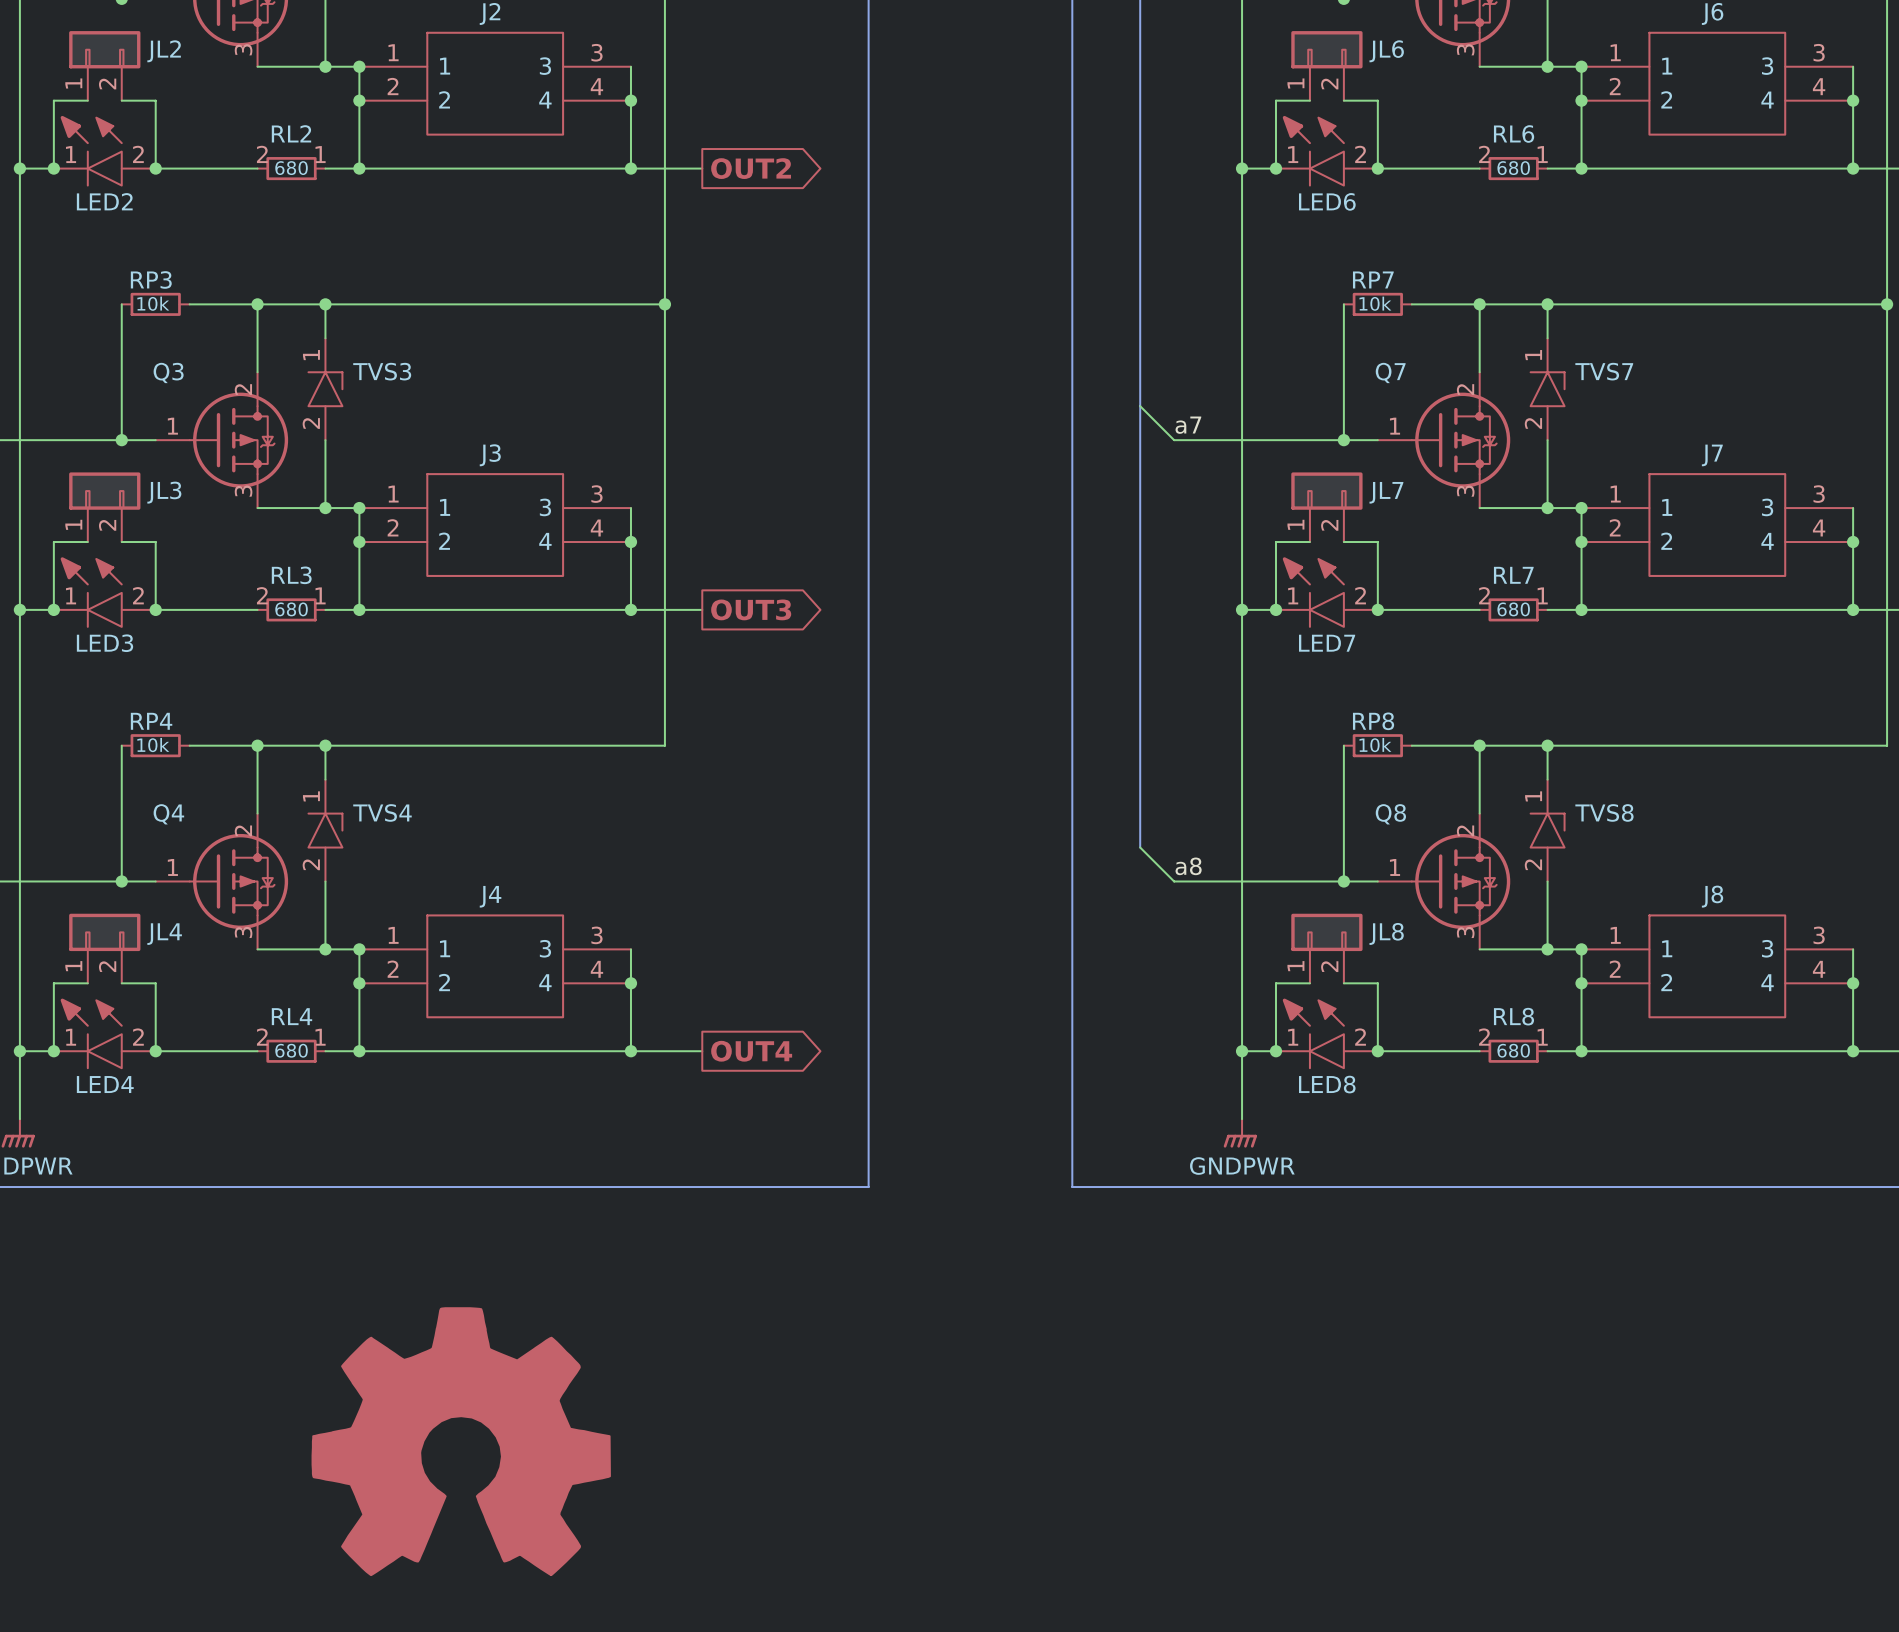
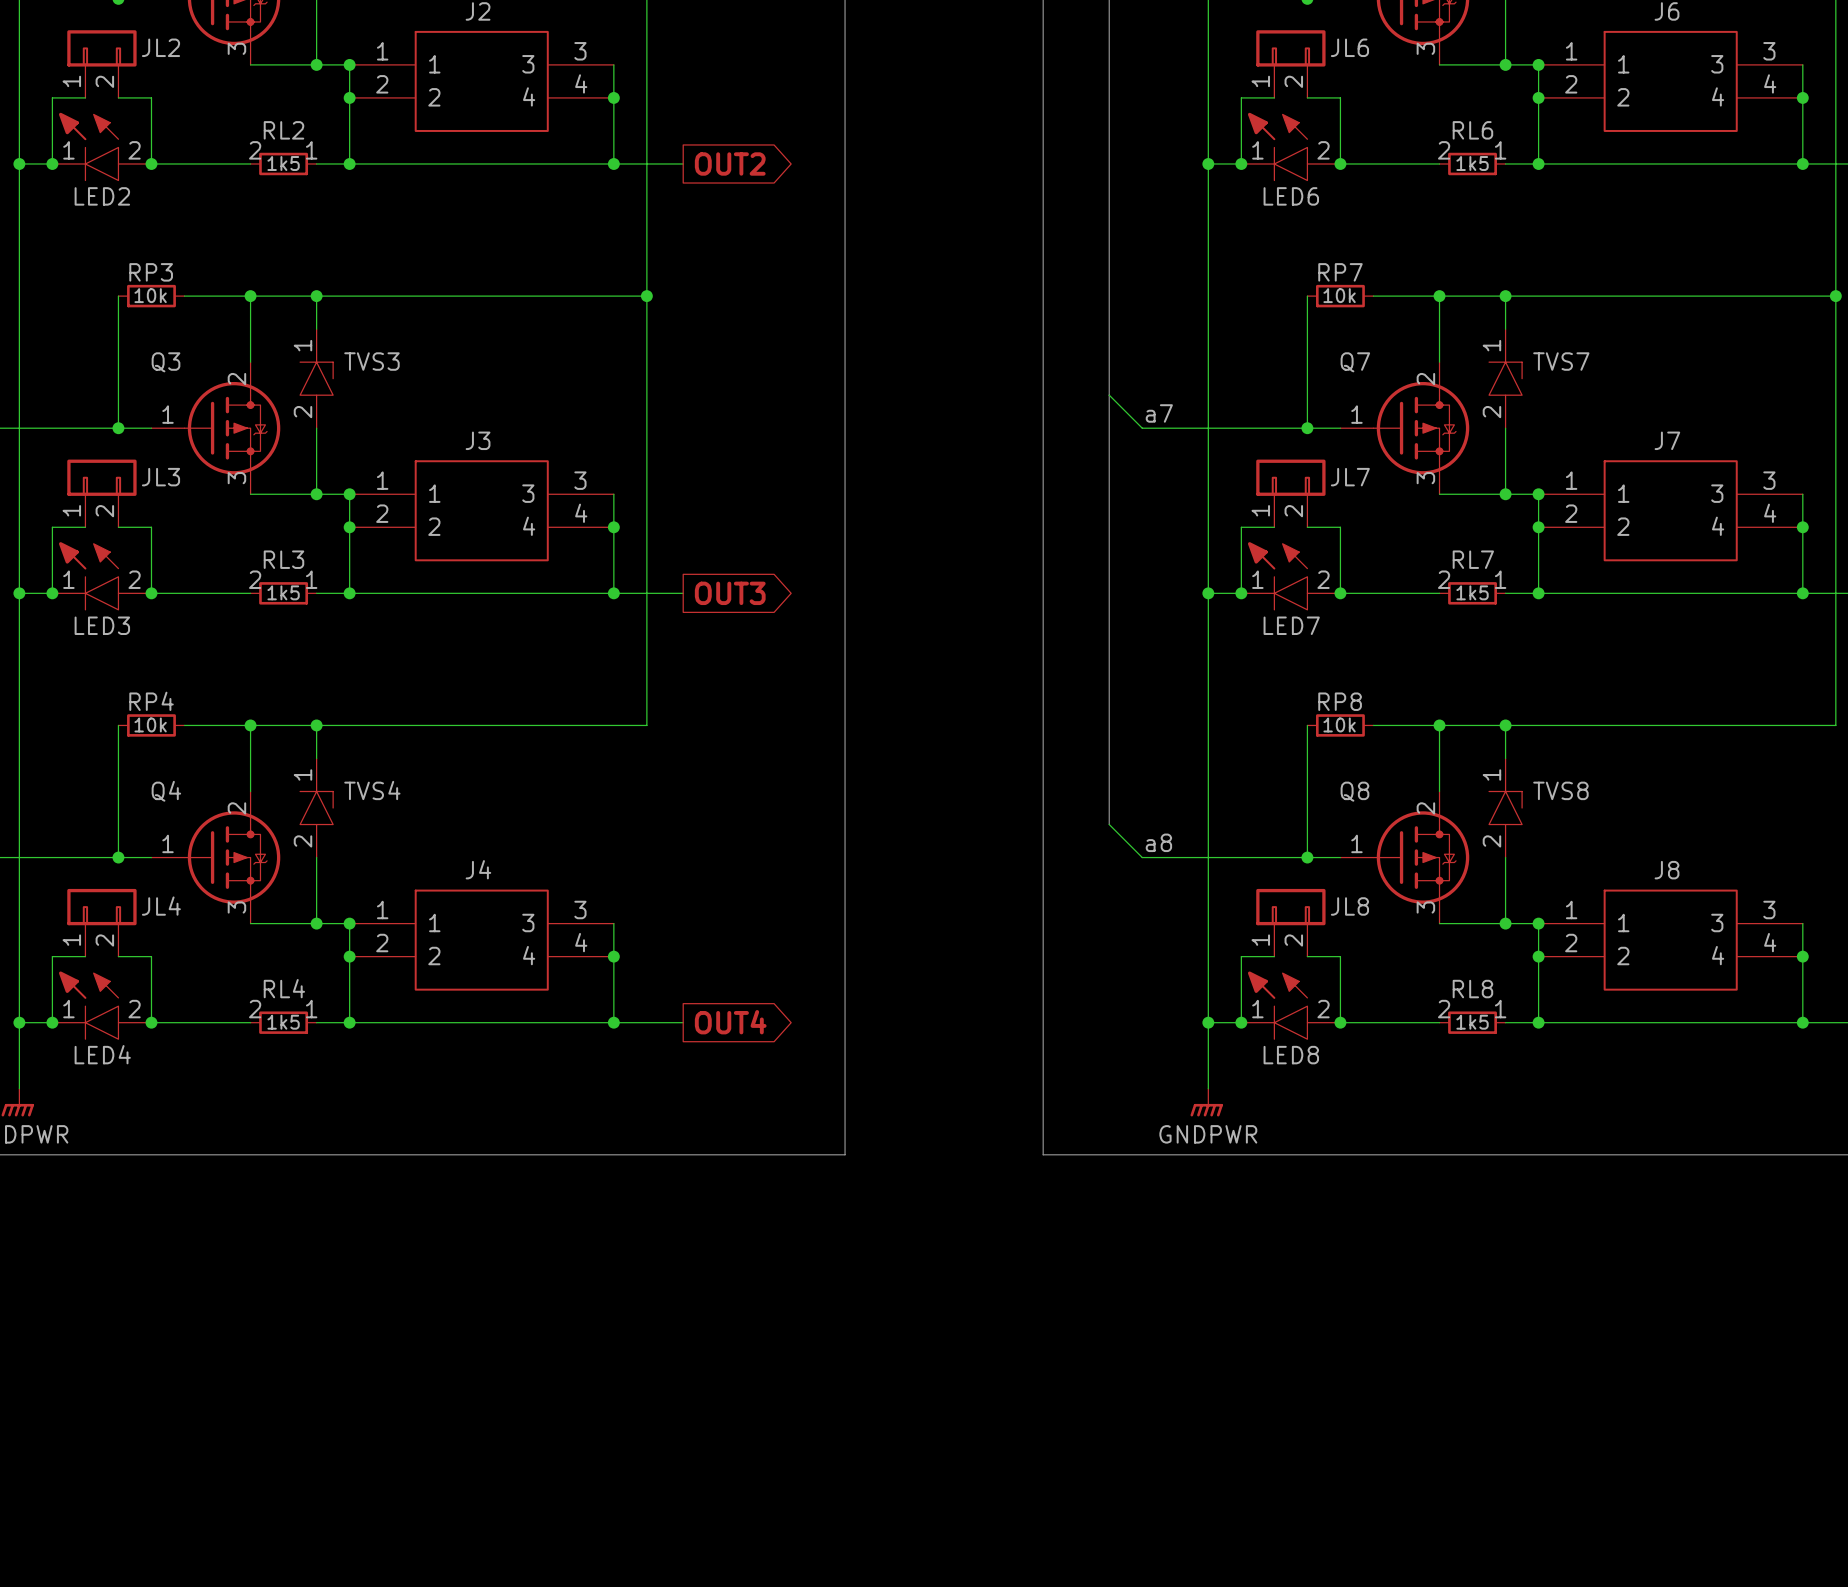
RL2 value: 680 (291, 168) -> 1k5 (283, 163)
RL6 value: 680 (1513, 168) -> 1k5 (1472, 163)
RL3 value: 680 (291, 609) -> 1k5 (283, 592)
RL7 value: 680 (1513, 609) -> 1k5 (1472, 592)
RL4 value: 680 (291, 1050) -> 1k5 (283, 1022)
RL8 value: 680 (1513, 1050) -> 1k5 (1472, 1022)
power symbol: (461, 1441) -> none

